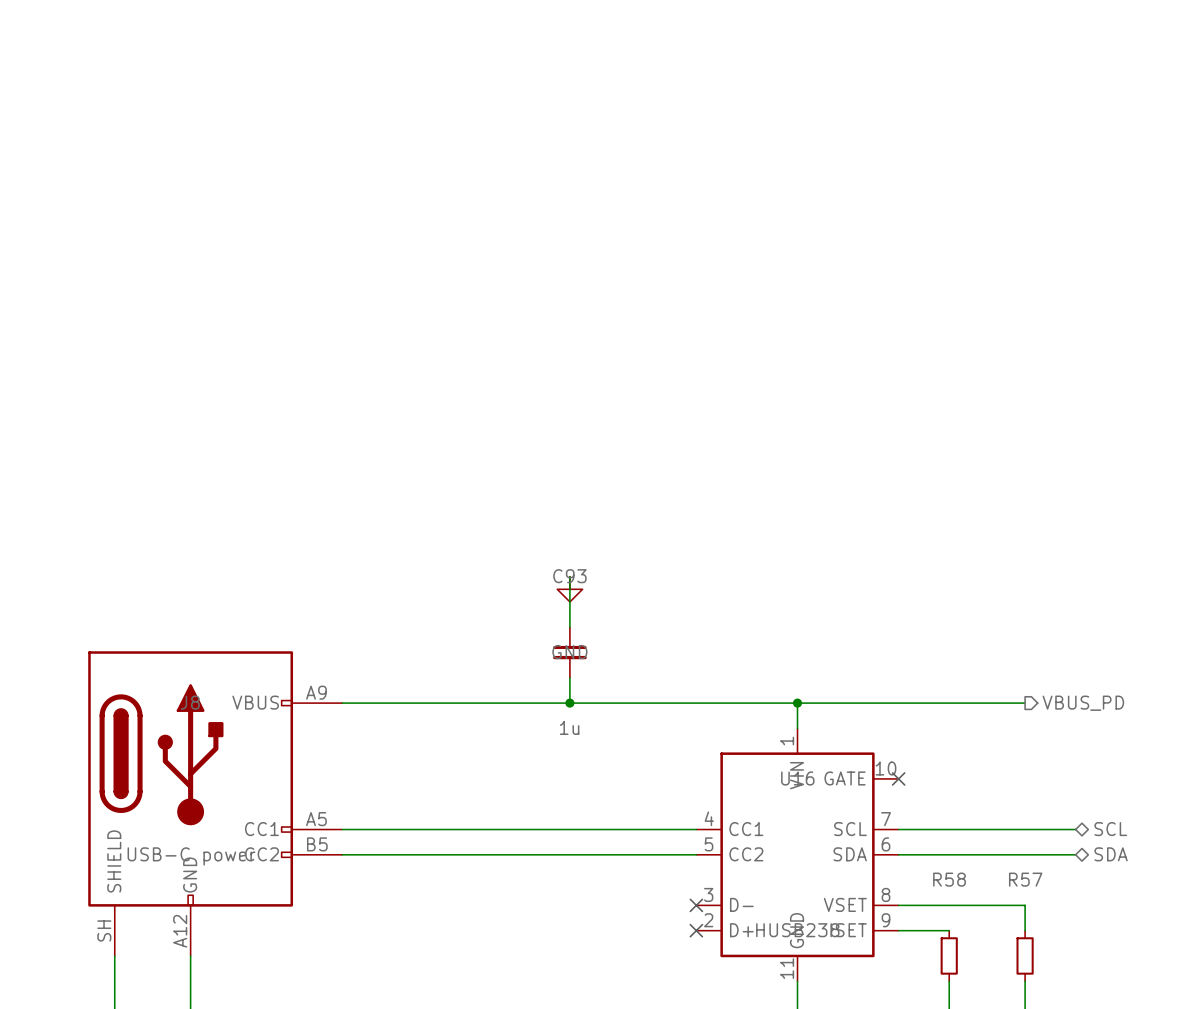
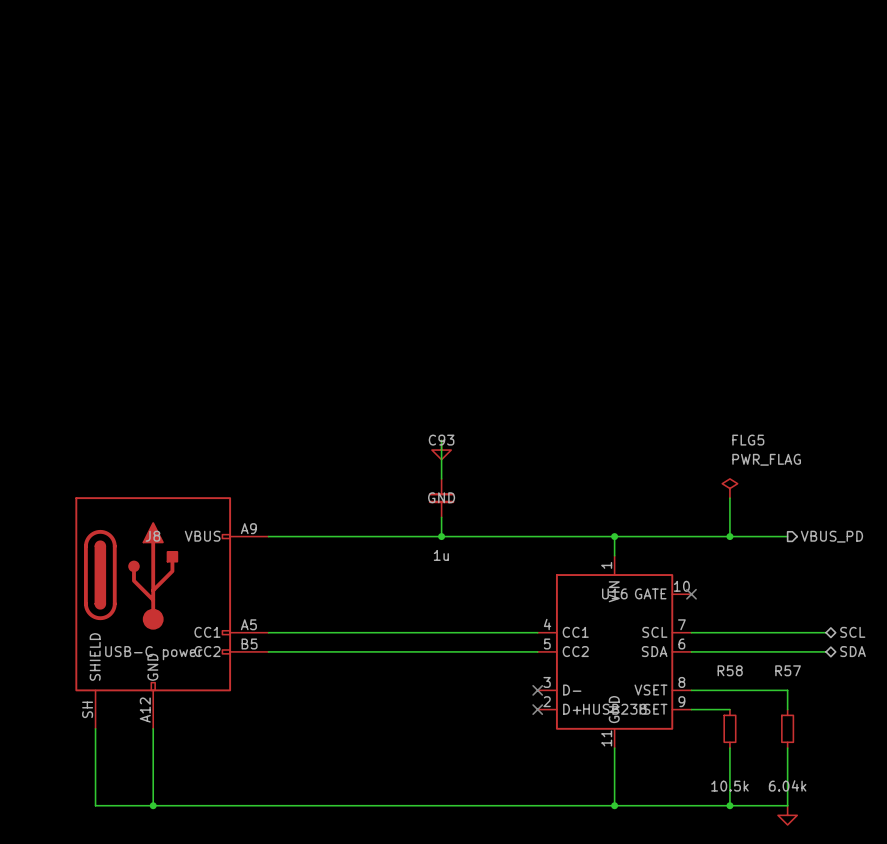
FLG5: none -> PWR_FLAG (729, 488)
wire: none -> (729, 498) (729, 536)
junction: none -> (729, 536)

